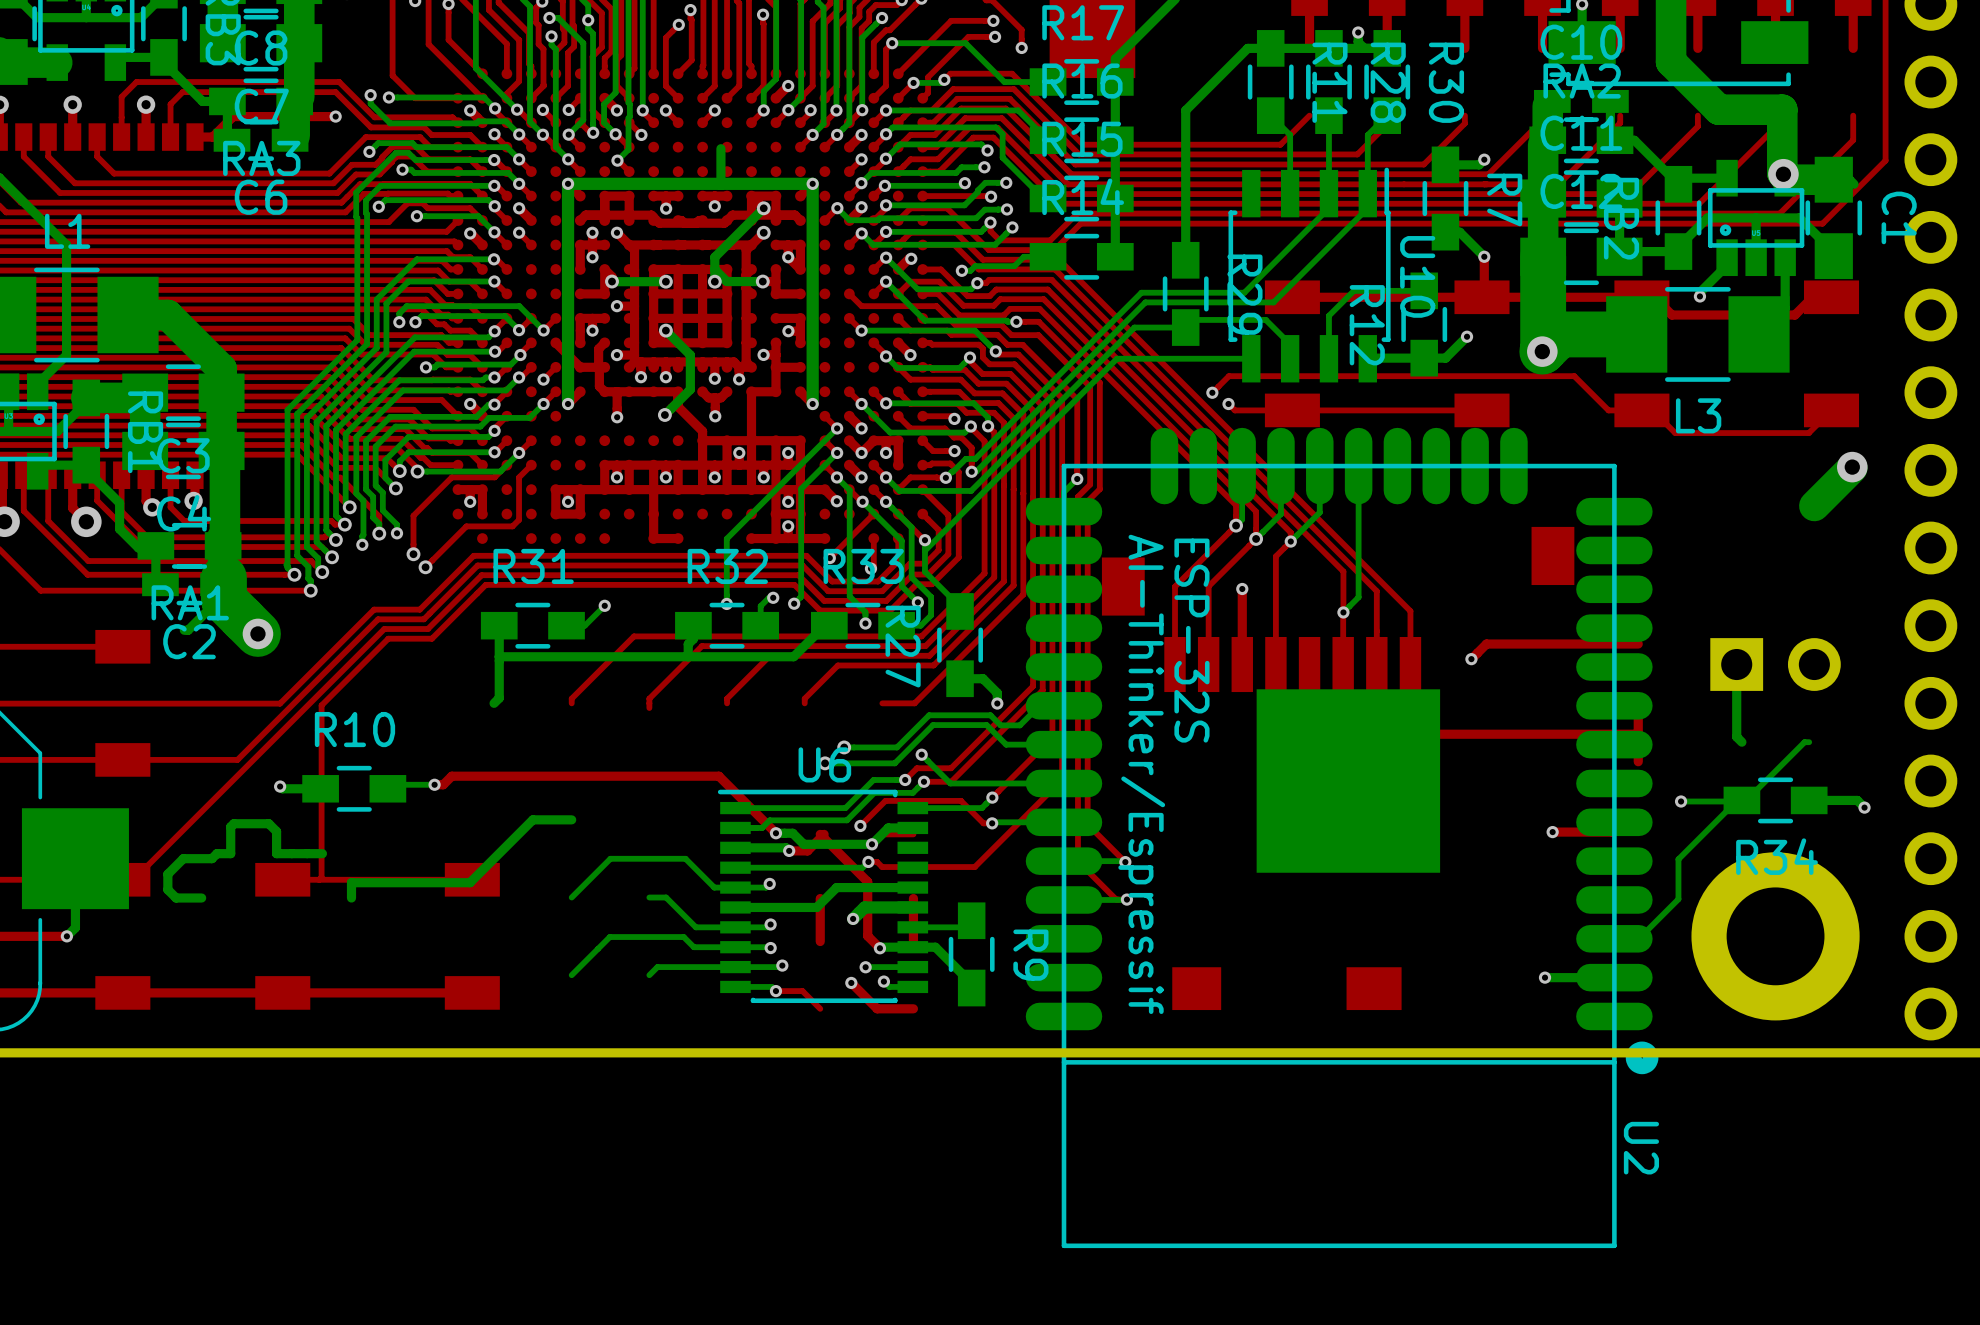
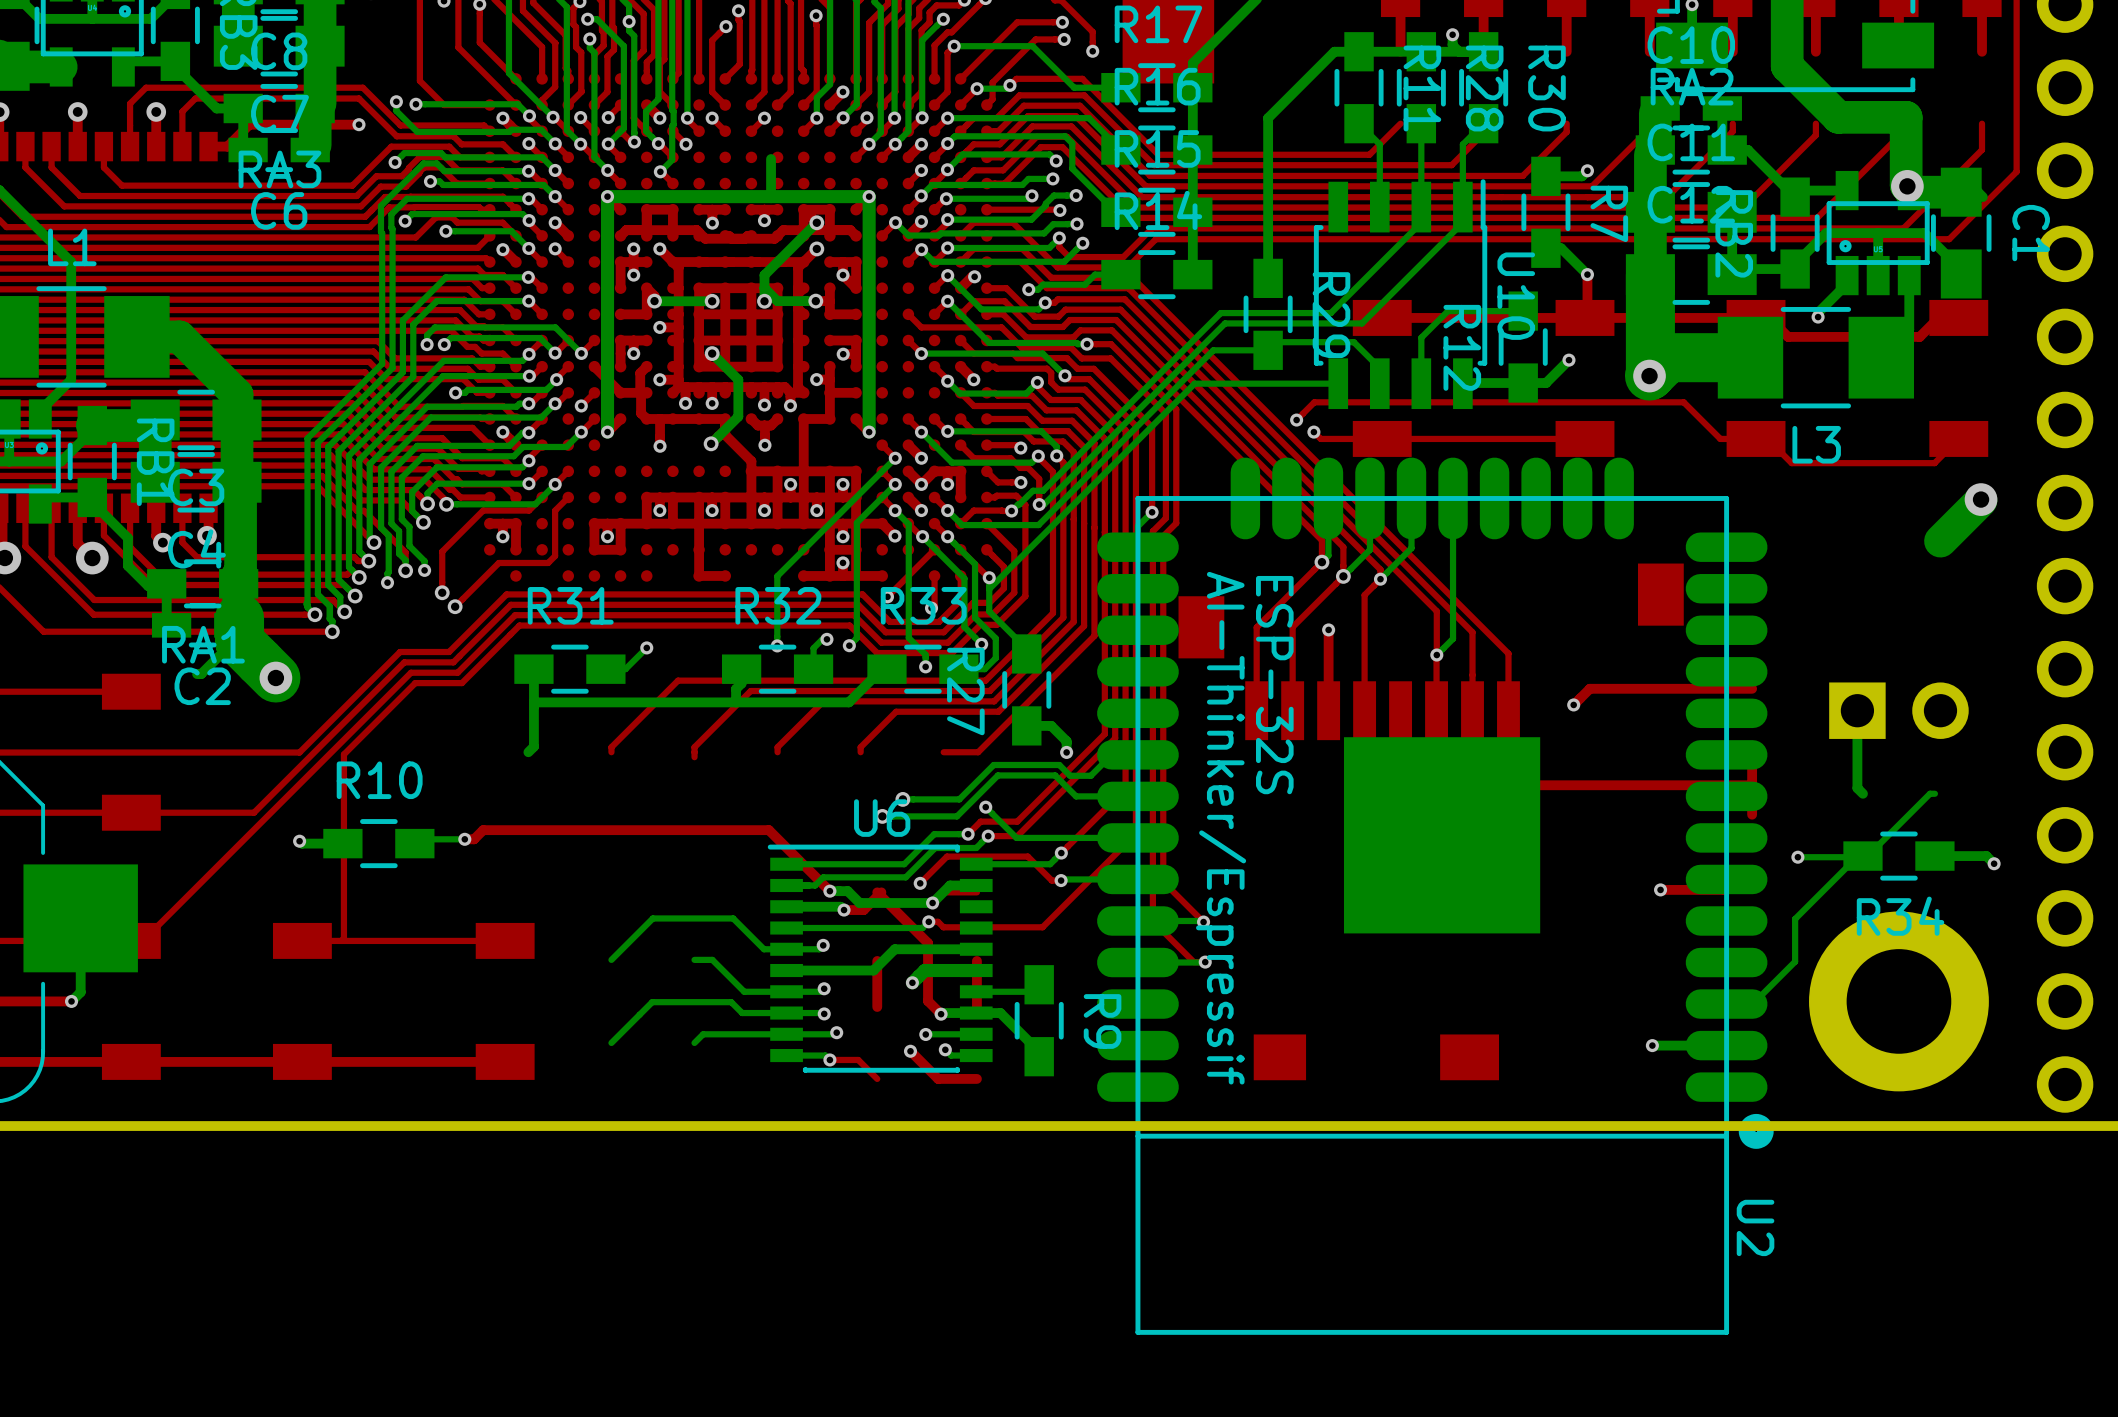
bottom track: (571, 819) (532, 819) (470, 882) (351, 882) (351, 898) -> none
bottom track: (322, 853) (276, 853) (276, 831) (268, 823) (233, 823) (230, 826) (230, 853) (216, 853) (211, 858) (183, 858) (167, 874) (167, 889) (176, 898) (201, 898) -> none

